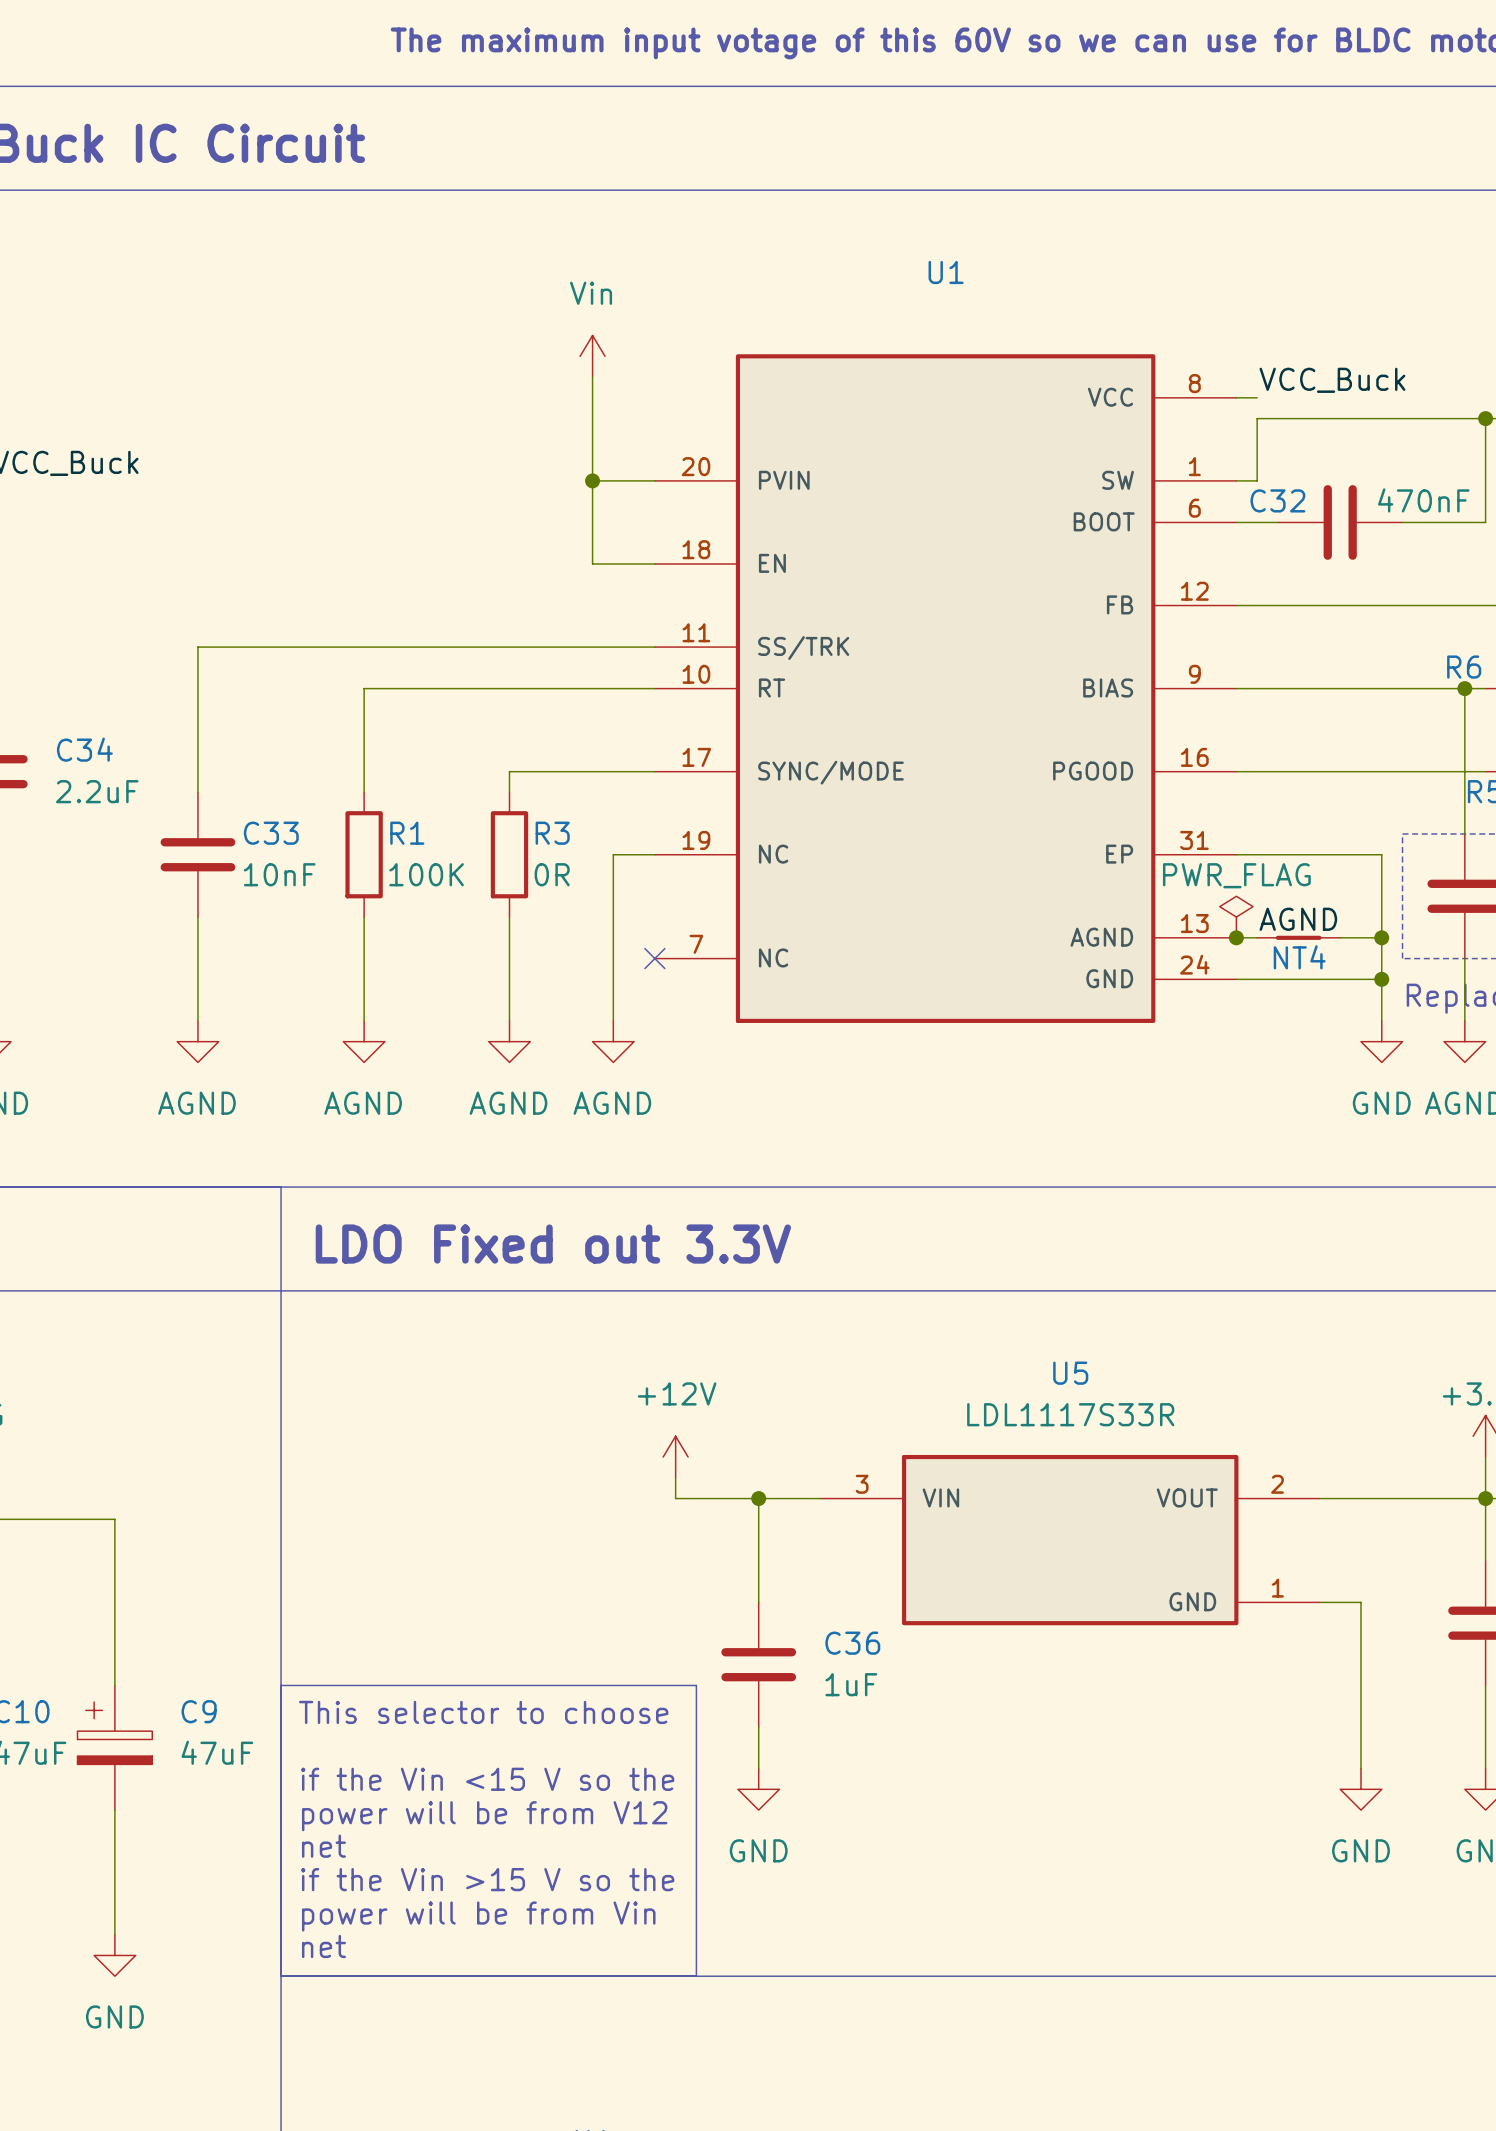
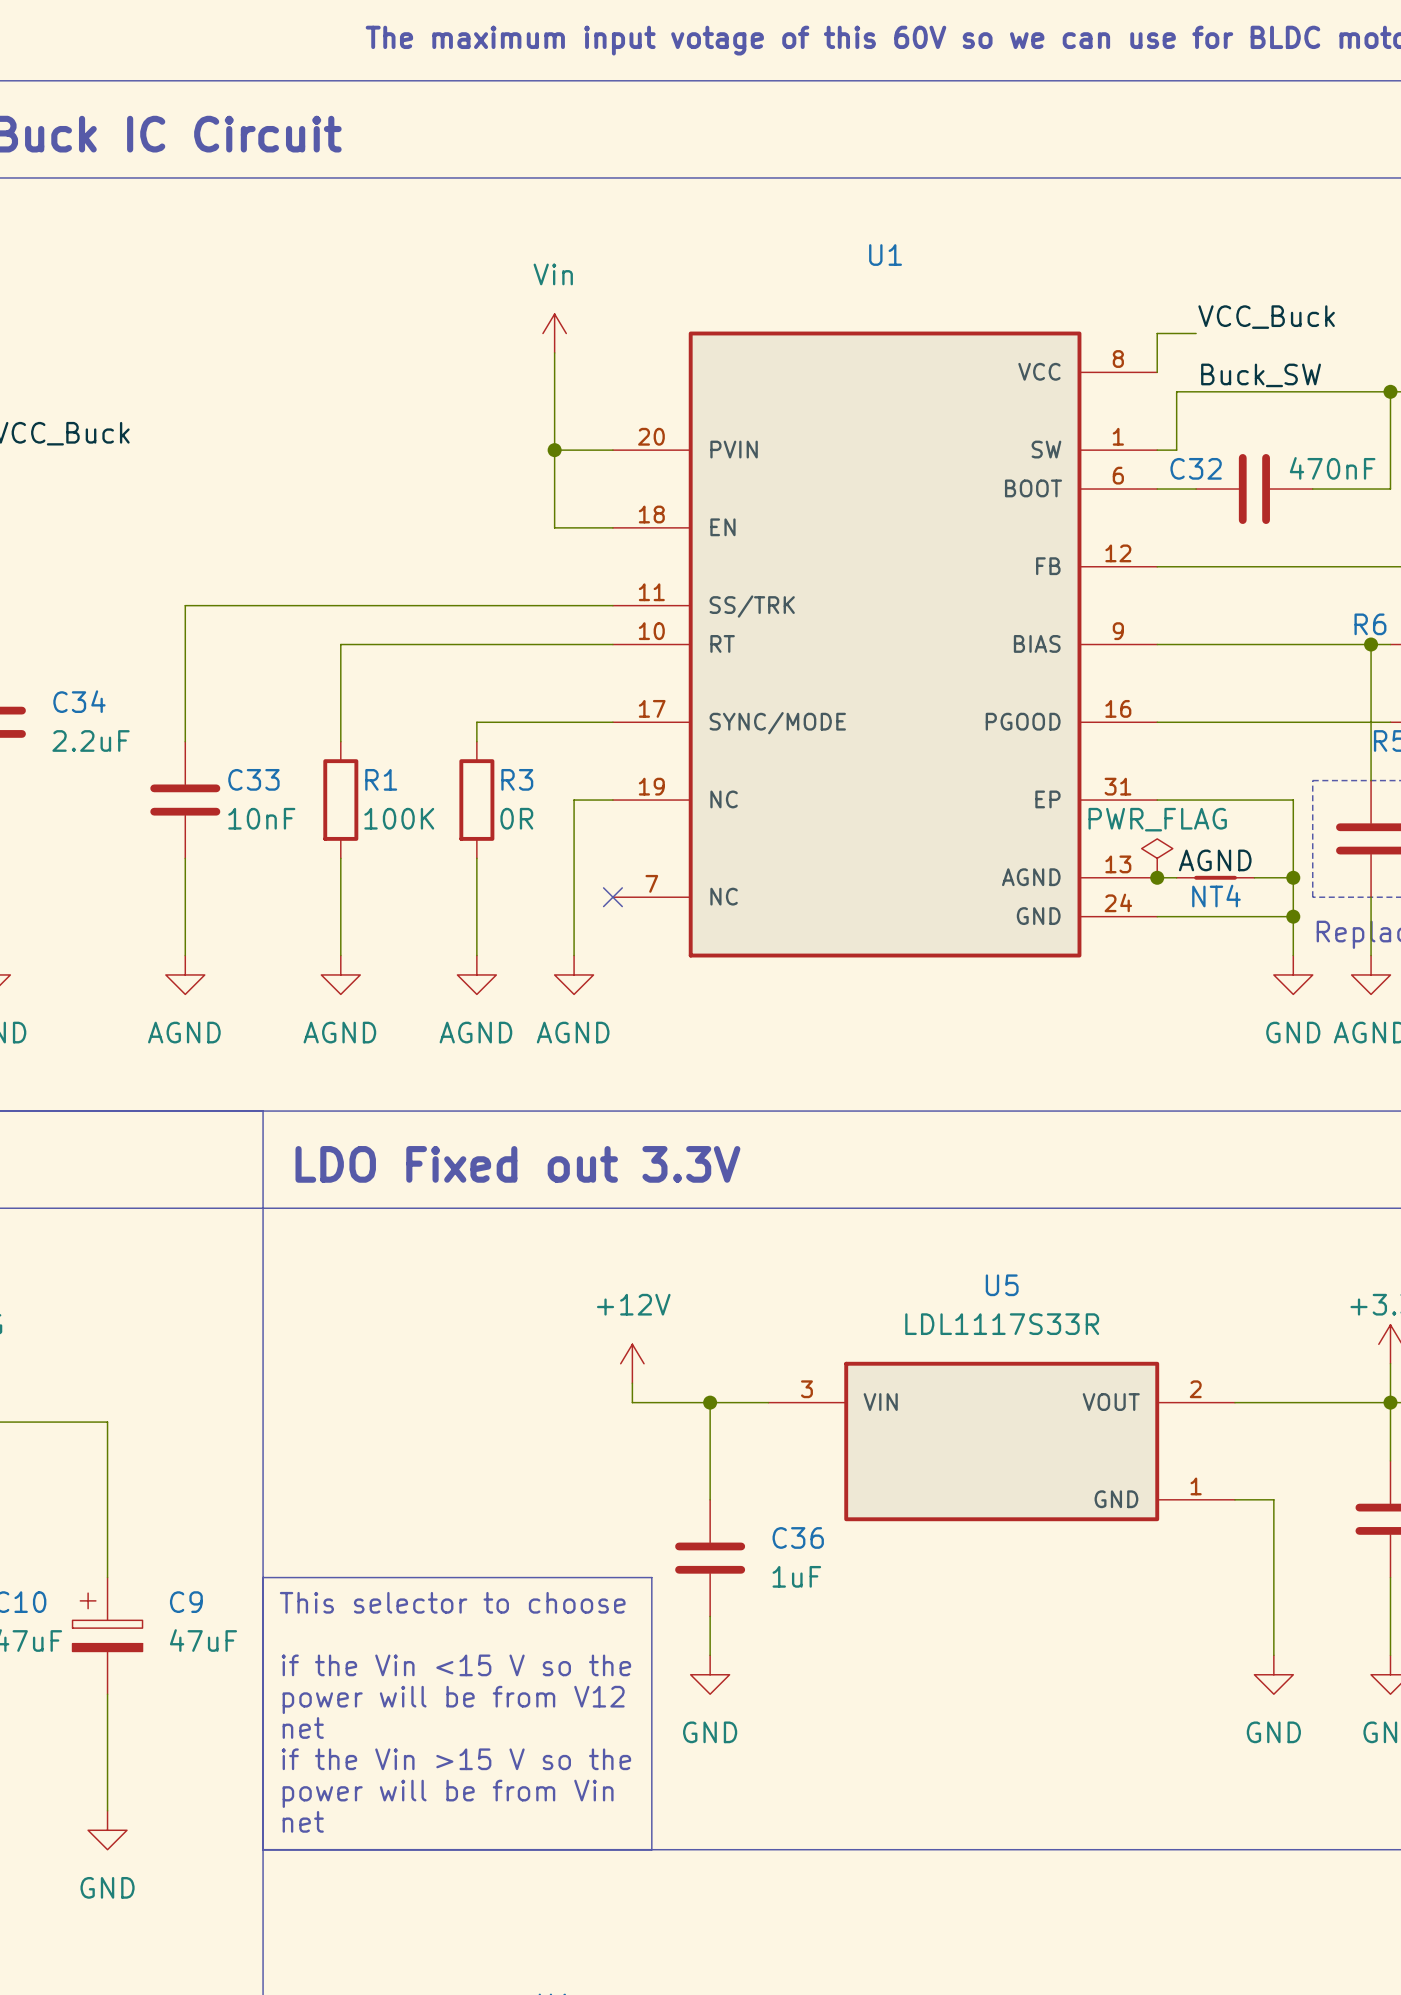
label position: VCC_Buck (1332, 380) -> VCC_Buck (1266, 317)
wire: (1236, 397) (1257, 397) -> (1157, 372) (1157, 333) (1196, 333)
label: none -> Buck_SW (1261, 375)

